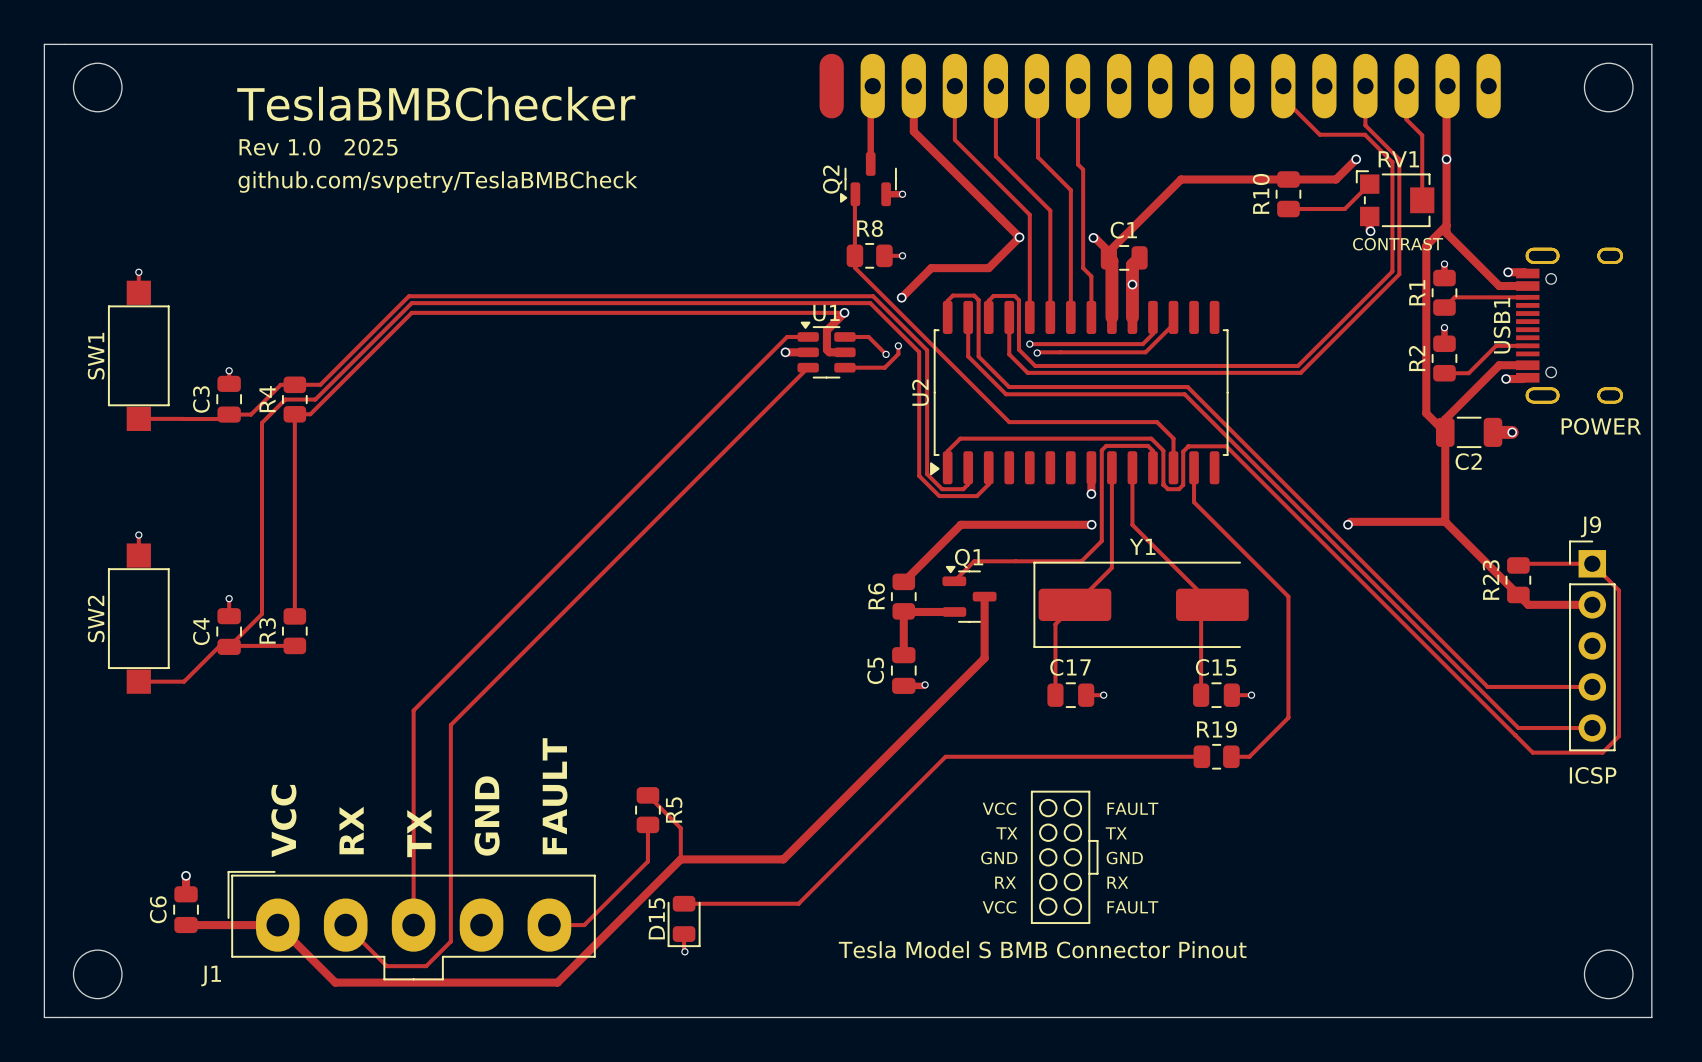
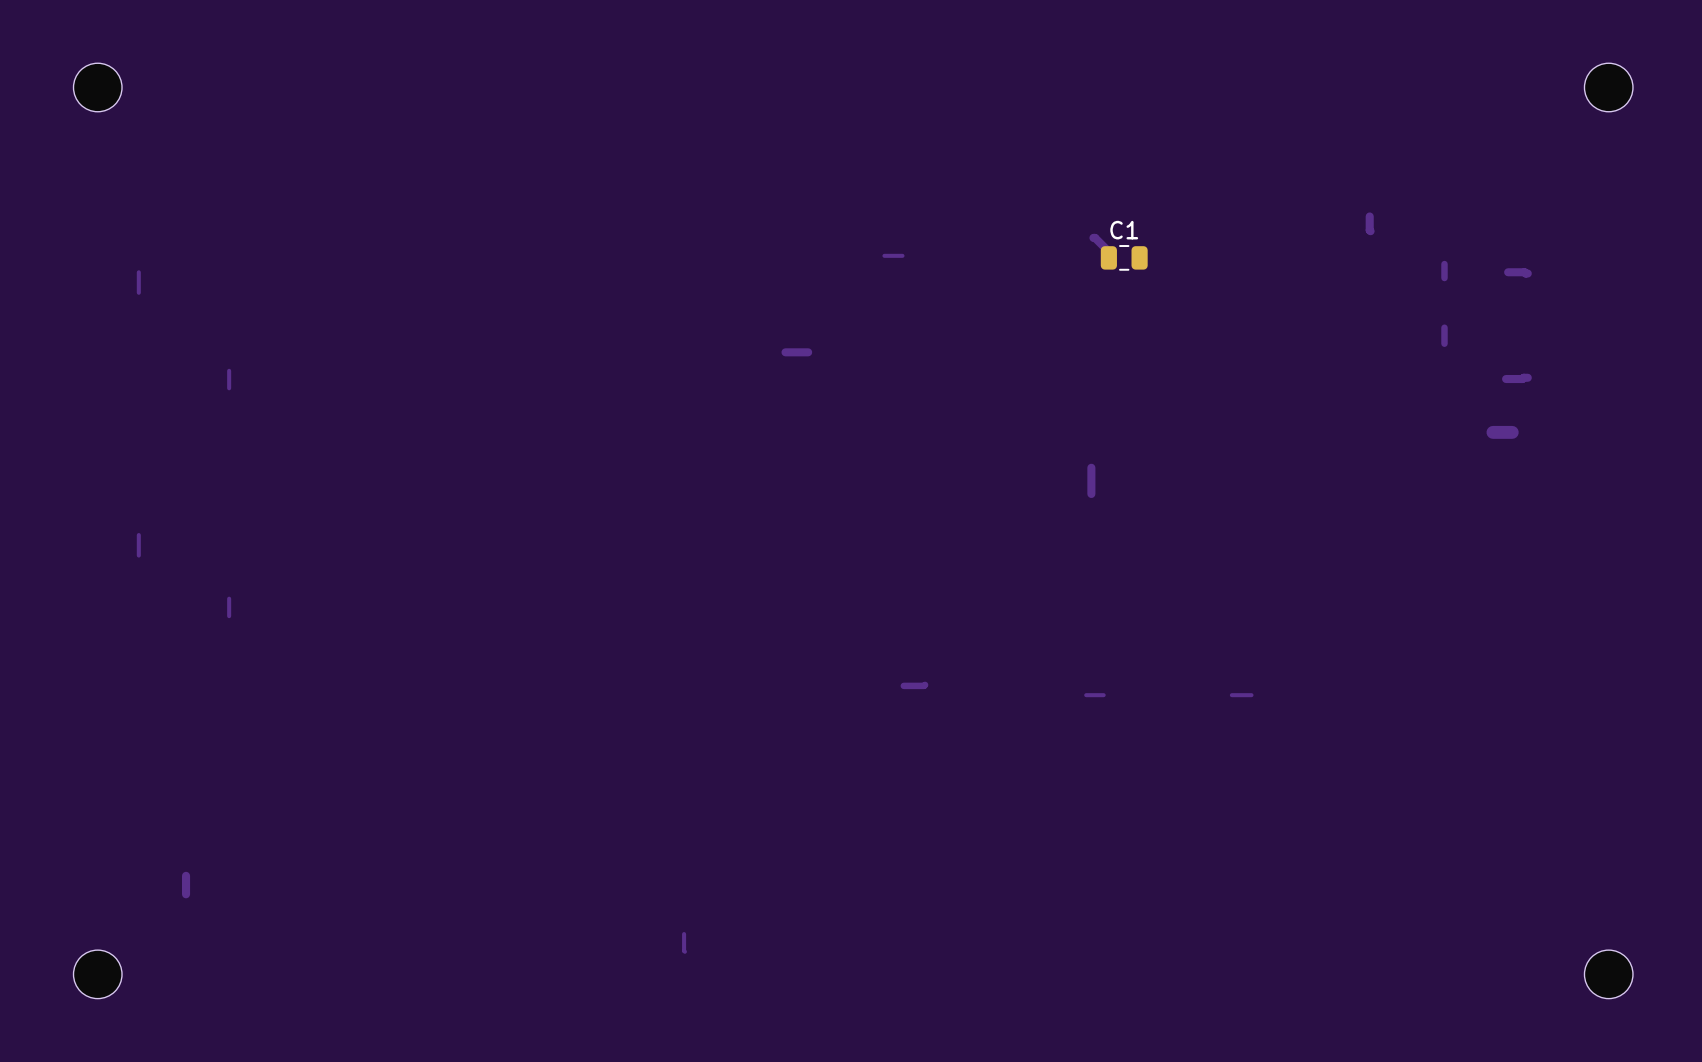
board edge: (44, 44) (44, 1017) (1651, 1017) (1651, 44) (44, 44) -> none
track: (872, 86) (870, 88) (870, 163) -> none
track: (913, 86) (913, 131) (1019, 237) (988, 268) (931, 268) (901, 297) -> none
track: (954, 86) (954, 139) (1029, 214) (1029, 317) -> none
track: (995, 86) (995, 156) (1050, 210) (1050, 317) -> none
track: (1036, 86) (1038, 157) (1070, 190) (1070, 317) -> none
track: (1078, 86) (1078, 164) (1083, 169) (1083, 268) (1091, 276) (1091, 317) -> none
part: (1160, 86) -> none
track: (1283, 86) (1283, 98) (1319, 134) (1364, 134) (1392, 162) (1392, 271) (1297, 365) (1035, 365) (1018, 349) (1018, 300) (1014, 295) (993, 295) (988, 300) (988, 317) -> none
track: (1365, 86) (1365, 125) (1399, 159) (1399, 274) (1300, 372) (1027, 372) (1009, 354) (1009, 317) -> none
track: (1406, 86) (1406, 119) (1422, 135) (1422, 200) -> none
track: (1447, 86) (1446, 233) (1499, 286) (1527, 286) -> none
text: TeslaBMBChecker (436, 103) -> none
text: Rev 1.0 2025 (318, 147) -> none
track: (1356, 159) (1336, 179) (1181, 179) (1108, 251) (1108, 257) (1111, 260) (1111, 317) -> none
via: (1356, 159) -> none
via: (1446, 159) -> none
Q2: (868, 179) -> none
text: github.com/svpetry/TeslaBMBCheck (437, 182) -> none
track: (1369, 184) (1344, 209) (1288, 209) -> none
track: (855, 194) (855, 268) (1009, 422) (1157, 422) (1173, 438) (1173, 467) -> none
track: (886, 194) (902, 194) -> none
via: (902, 194) -> none
R10: (1288, 194) -> none
RV1: (1395, 198) -> none
track: (1446, 225) (1426, 245) (1426, 413) (1445, 432) (1445, 427) -> none
via: (1370, 231) -> none
via: (1019, 237) -> none
via: (1093, 237) -> none
text: CONTRAST (1398, 244) -> none
R8: (869, 255) -> none
via: (902, 255) -> none
track: (1139, 257) (1132, 265) (1132, 317) -> none
via: (1444, 264) -> none
via: (138, 272) -> none
via: (1508, 272) -> none
via: (1132, 284) -> none
R1: (1444, 292) -> none
via: (901, 297) -> none
track: (1527, 297) (1454, 297) (1444, 307) -> none
via: (844, 312) -> none
track: (947, 317) (947, 300) (952, 295) (974, 295) (978, 300) (978, 356) (1009, 387) (1187, 387) (1487, 686) (1592, 686) -> none
track: (968, 317) (968, 356) (1006, 394) (1184, 394) (1518, 728) (1592, 728) -> none
track: (1152, 317) (1152, 333) (1142, 344) (1029, 344) -> none
track: (1173, 317) (1173, 324) (1145, 352) (1037, 353) -> none
USB1: (1569, 325) -> none
via: (1444, 327) -> none
track: (808, 336) (787, 336) (413, 710) (413, 925) -> none
track: (844, 336) (868, 336) (886, 354) -> none
via: (1029, 344) -> none
track: (898, 345) (898, 354) (884, 367) (844, 367) -> none
via: (898, 345) -> none
track: (1527, 345) (1496, 345) (1468, 373) (1444, 373) -> none
U1: (826, 350) -> none
via: (785, 352) -> none
track: (844, 352) (829, 352) (826, 349) (826, 330) (844, 312) (411, 312) (310, 414) (294, 414) (294, 616) -> none
via: (1037, 353) -> none
via: (886, 354) -> none
SW1: (138, 355) -> none
R2: (1444, 358) -> none
track: (1527, 365) (1499, 365) (1445, 419) (1445, 521) -> none
track: (808, 367) (450, 724) (450, 941) (426, 966) (386, 966) (345, 925) -> none
via: (229, 370) -> none
via: (1506, 379) -> none
U2: (1079, 392) -> none
C3: (229, 399) -> none
R4: (294, 399) -> none
track: (229, 414) (251, 414) (280, 384) (320, 384) (408, 296) (873, 296) (927, 350) (927, 474) (942, 489) (963, 489) (968, 484) (968, 467) -> none
track: (138, 418) (183, 418) -> none
track: (183, 419) (229, 419) -> none
text: POWER (1601, 426) -> none
C2: (1469, 432) -> none
via: (1512, 432) -> none
track: (947, 467) (947, 451) (960, 438) (1151, 438) (1163, 450) (1163, 484) -> none
track: (988, 467) (988, 484) (976, 496) (939, 496) (919, 475) (919, 352) (870, 303) (411, 303) (315, 399) (285, 399) (261, 422) (261, 614) (229, 646) -> none
track: (1111, 467) (1111, 567) (1055, 624) (1055, 695) -> none
track: (1132, 467) (1132, 524) (1212, 604) (1201, 616) (1201, 695) -> none
track: (1152, 467) (1152, 450) (1148, 445) (1106, 445) (1101, 450) (1101, 541) (1081, 561) (974, 561) (954, 581) -> none
track: (1194, 467) (1194, 502) (1288, 596) (1288, 717) (1249, 756) (1231, 756) -> none
track: (1163, 484) (1167, 489) (1179, 489) (1183, 484) (1183, 451) (1188, 446) (1226, 446) (1532, 752) (1602, 752) (1618, 736) (1618, 590) (1592, 563) (1520, 563) (1518, 565) -> none
via: (1091, 493) -> none
track: (1445, 521) (1350, 521) (1348, 524) -> none
track: (1445, 521) (1528, 604) (1592, 604) -> none
track: (1091, 524) (960, 524) (902, 581) -> none
via: (1091, 524) -> none
via: (1348, 524) -> none
via: (138, 535) -> none
R23: (1518, 580) -> none
Q1: (969, 594) -> none
R6: (903, 596) -> none
track: (984, 596) (984, 658) (783, 859) (680, 859) -> none
via: (229, 598) -> none
Y1: (1141, 604) -> none
track: (954, 611) (903, 611) (903, 655) -> none
SW2: (138, 618) -> none
C4: (229, 631) -> none
R3: (294, 631) -> none
track: (230, 645) (294, 645) -> none
track: (238, 645) (218, 646) (184, 681) (138, 681) -> none
J9: (1592, 645) -> none
C5: (903, 670) -> none
via: (925, 684) -> none
C17: (1070, 695) -> none
via: (1103, 695) -> none
C15: (1216, 695) -> none
via: (1251, 695) -> none
track: (1201, 756) (945, 756) (798, 903) (684, 903) -> none
R19: (1216, 756) -> none
text: ICSP (1593, 775) -> none
line: (1031, 791) (1031, 923) (1089, 923) (1089, 791) (1031, 791) -> none
track: (647, 795) (680, 828) (680, 859) -> none
text: FAULT (555, 796) -> none
drawing: [1039, 798, 1083, 916] -> none
text: VCC (999, 808) -> none
text: FAULT (1132, 808) -> none
R5: (647, 810) -> none
text: GND (487, 816) -> none
text: VCC (283, 821) -> none
track: (647, 824) (647, 861) (584, 925) (549, 925) -> none
text: RX (351, 830) -> none
text: TX (419, 833) -> none
text: TX (1006, 833) -> none
text: TX (1116, 833) -> none
line: (1089, 840) (1097, 840) (1097, 873) (1089, 873) -> none
text: GND (999, 858) -> none
text: GND (1124, 858) -> none
track: (680, 859) (557, 982) (335, 982) (277, 925) (186, 925) -> none
via: (186, 875) -> none
text: RX (1005, 882) -> none
text: RX (1117, 882) -> none
text: VCC (999, 907) -> none
text: FAULT (1132, 907) -> none
C6: (186, 909) -> none
D15: (684, 921) -> none
J1: (411, 925) -> none
text: Tesla Model S BMB Connector Pinout (1042, 949) -> none
via: (684, 951) -> none

